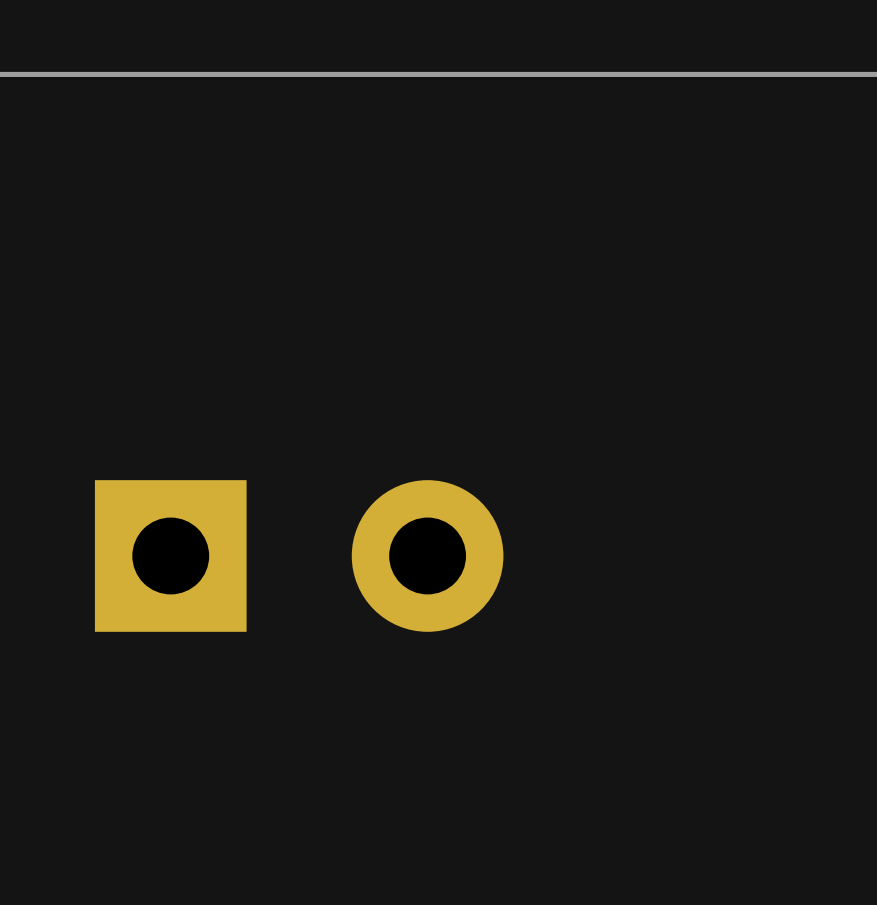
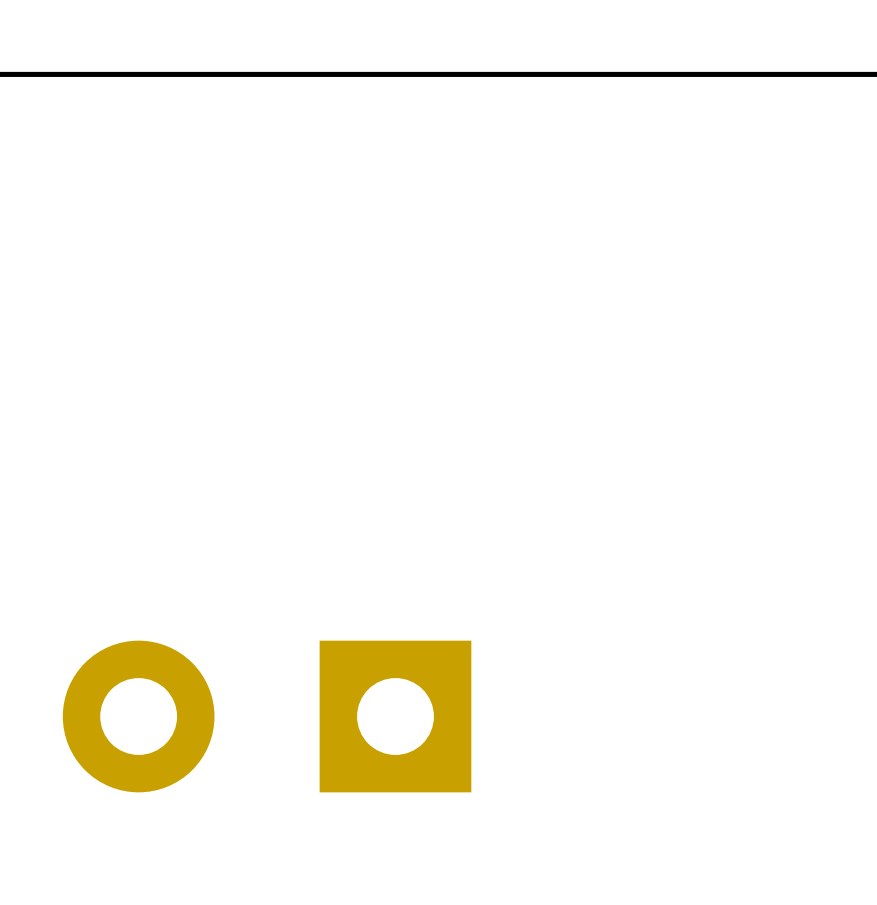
part rotation: 0° (299, 555) -> 180° (267, 716)

